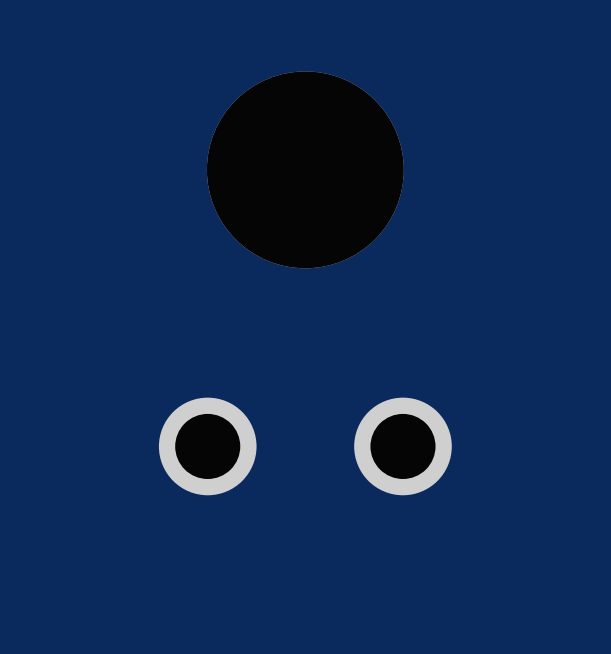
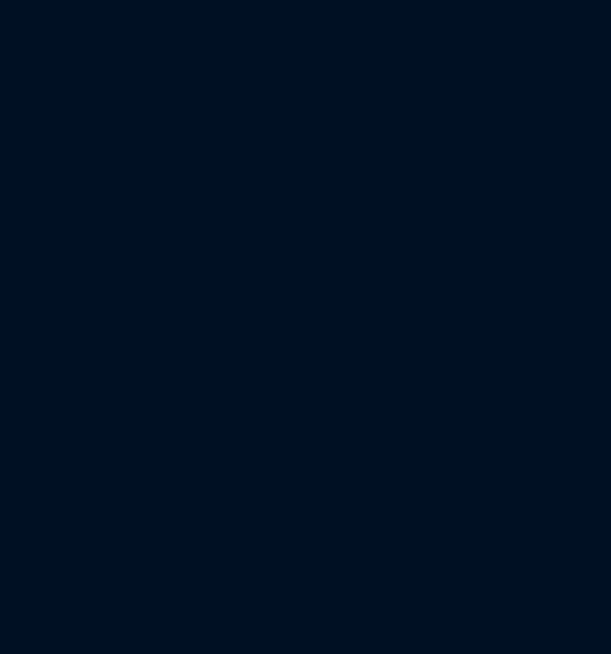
part: (305, 283) -> none

